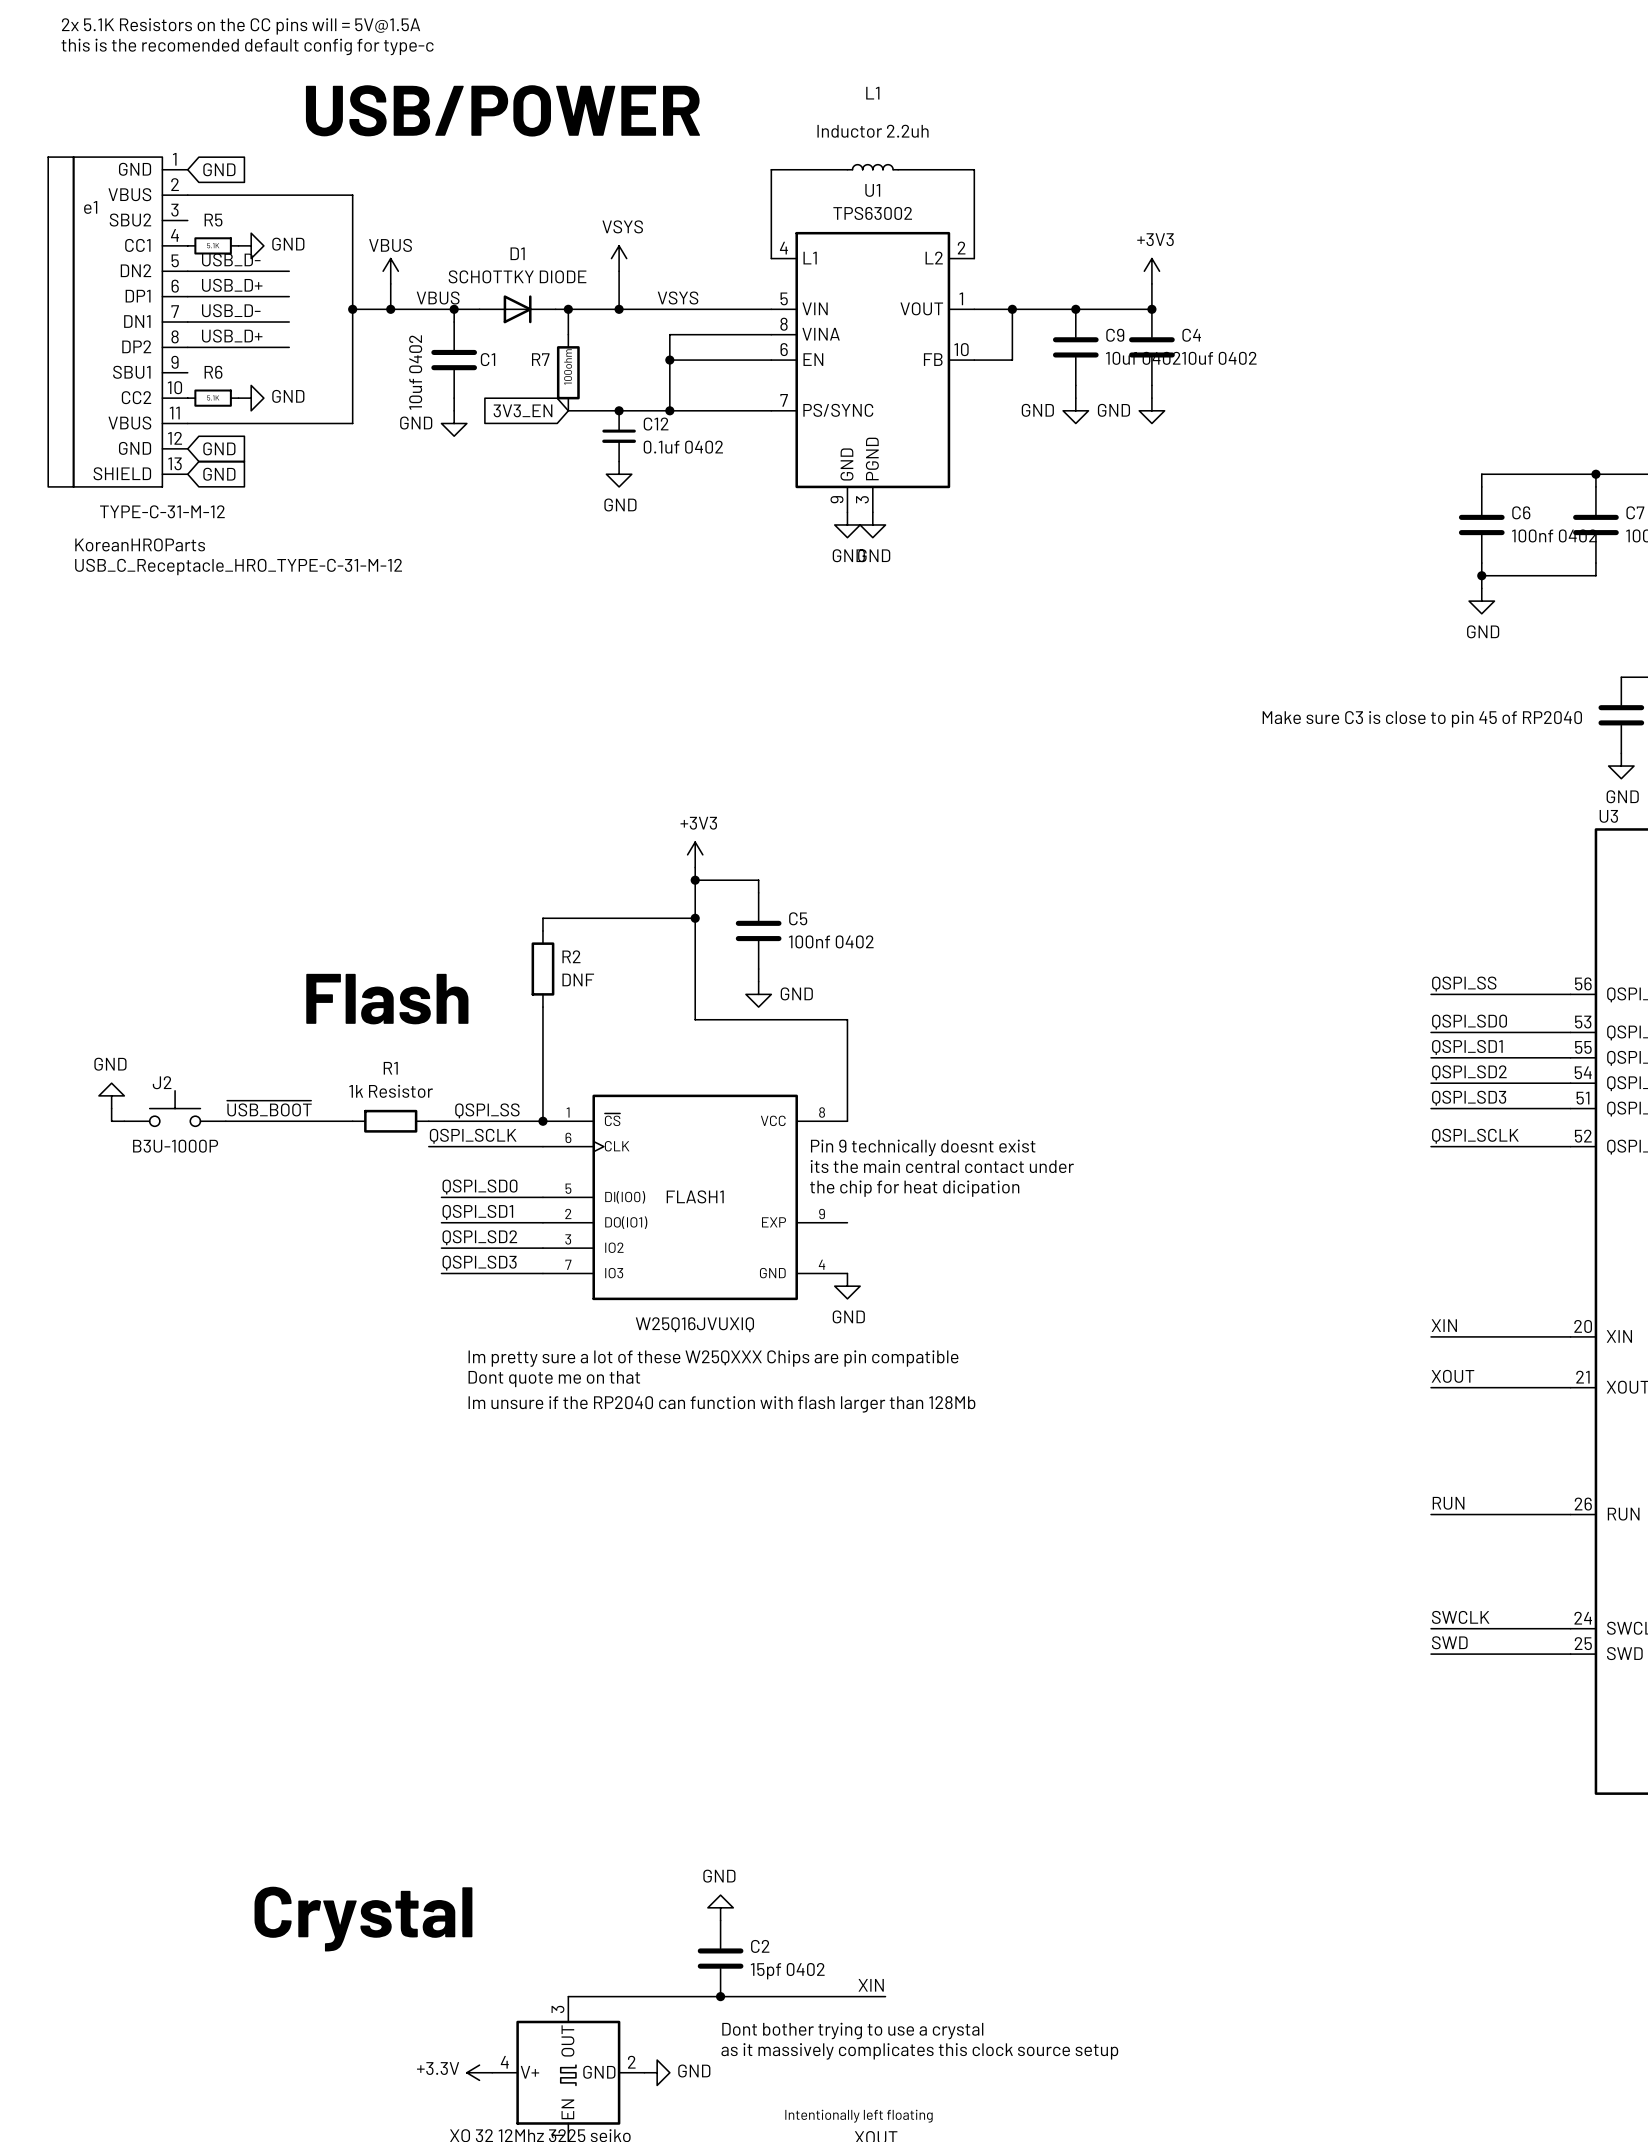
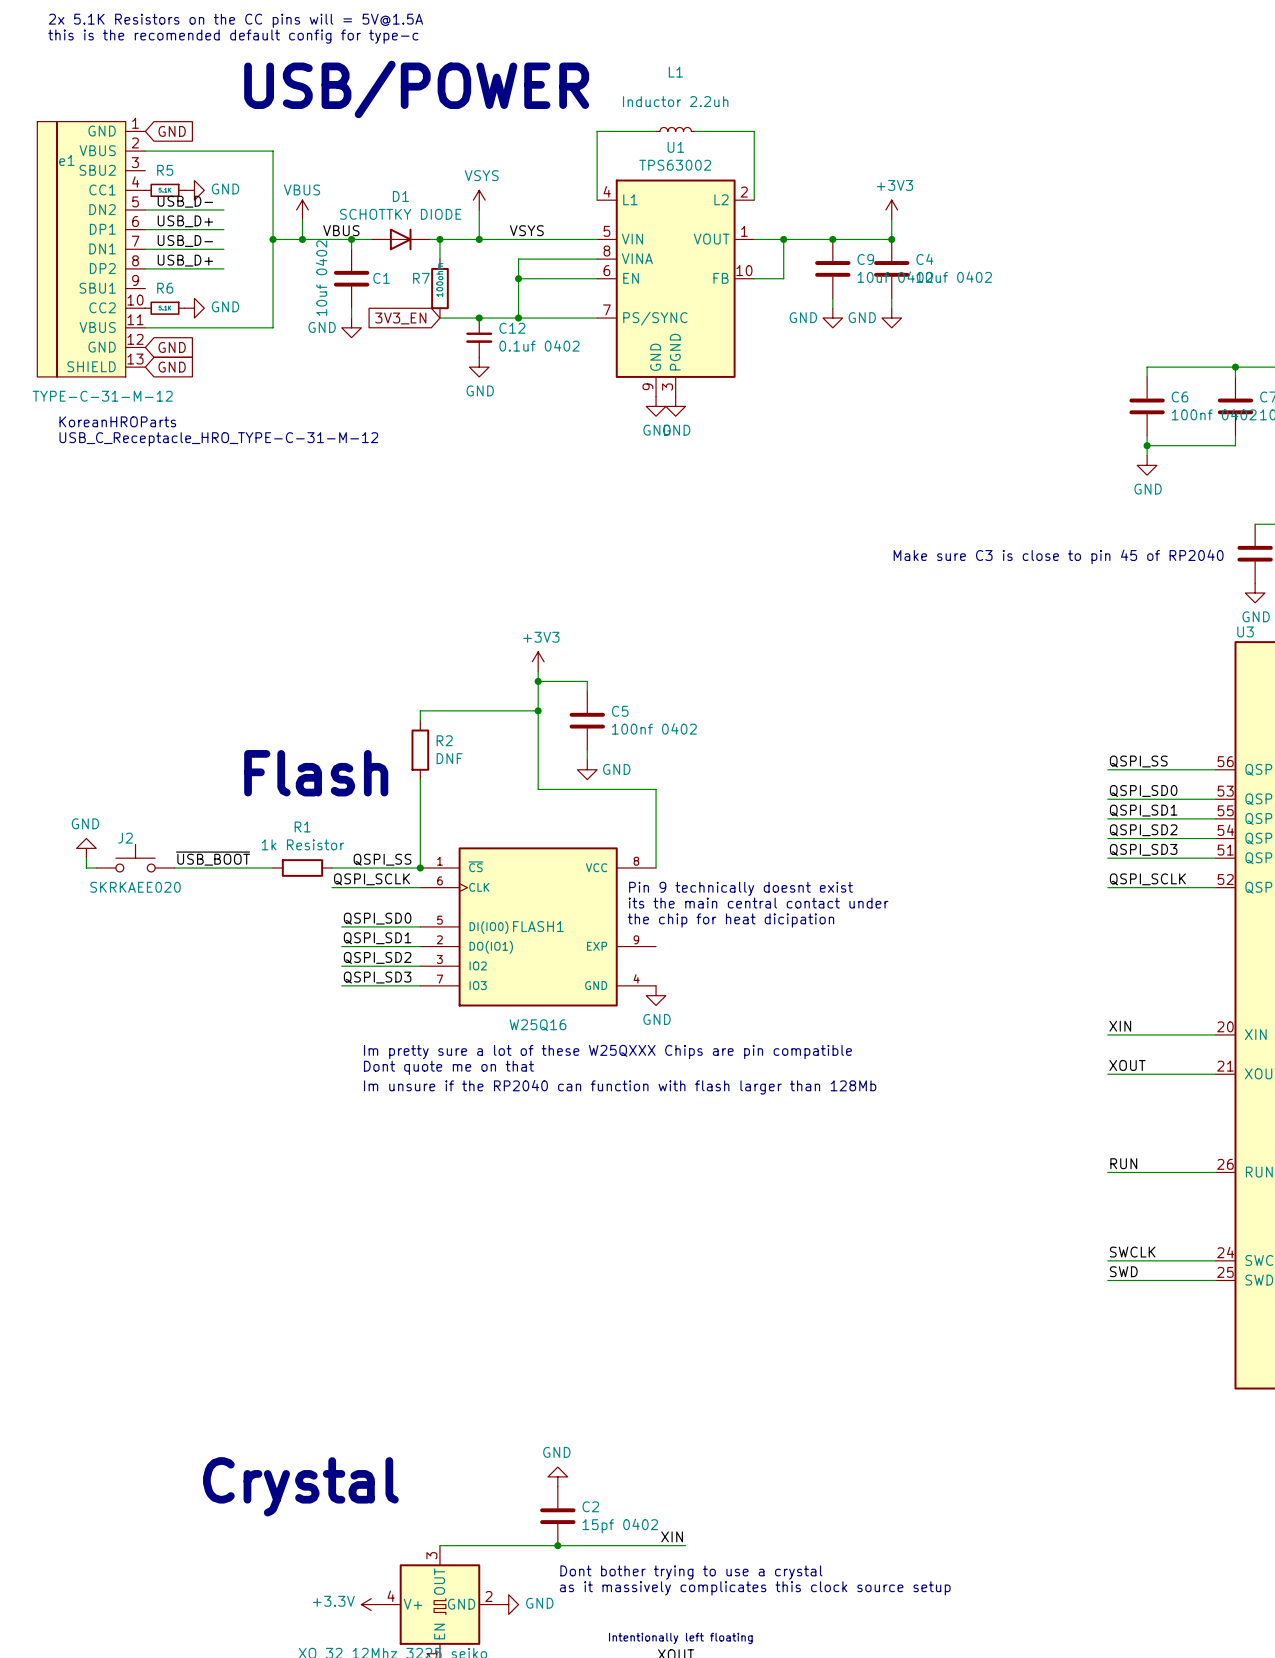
J2 value: B3U-1000P (175, 1146) -> SKRKAEE020 (135, 887)
FLASH1 value: W25Q16JVUXIQ (694, 1324) -> W25Q16 (537, 1025)

